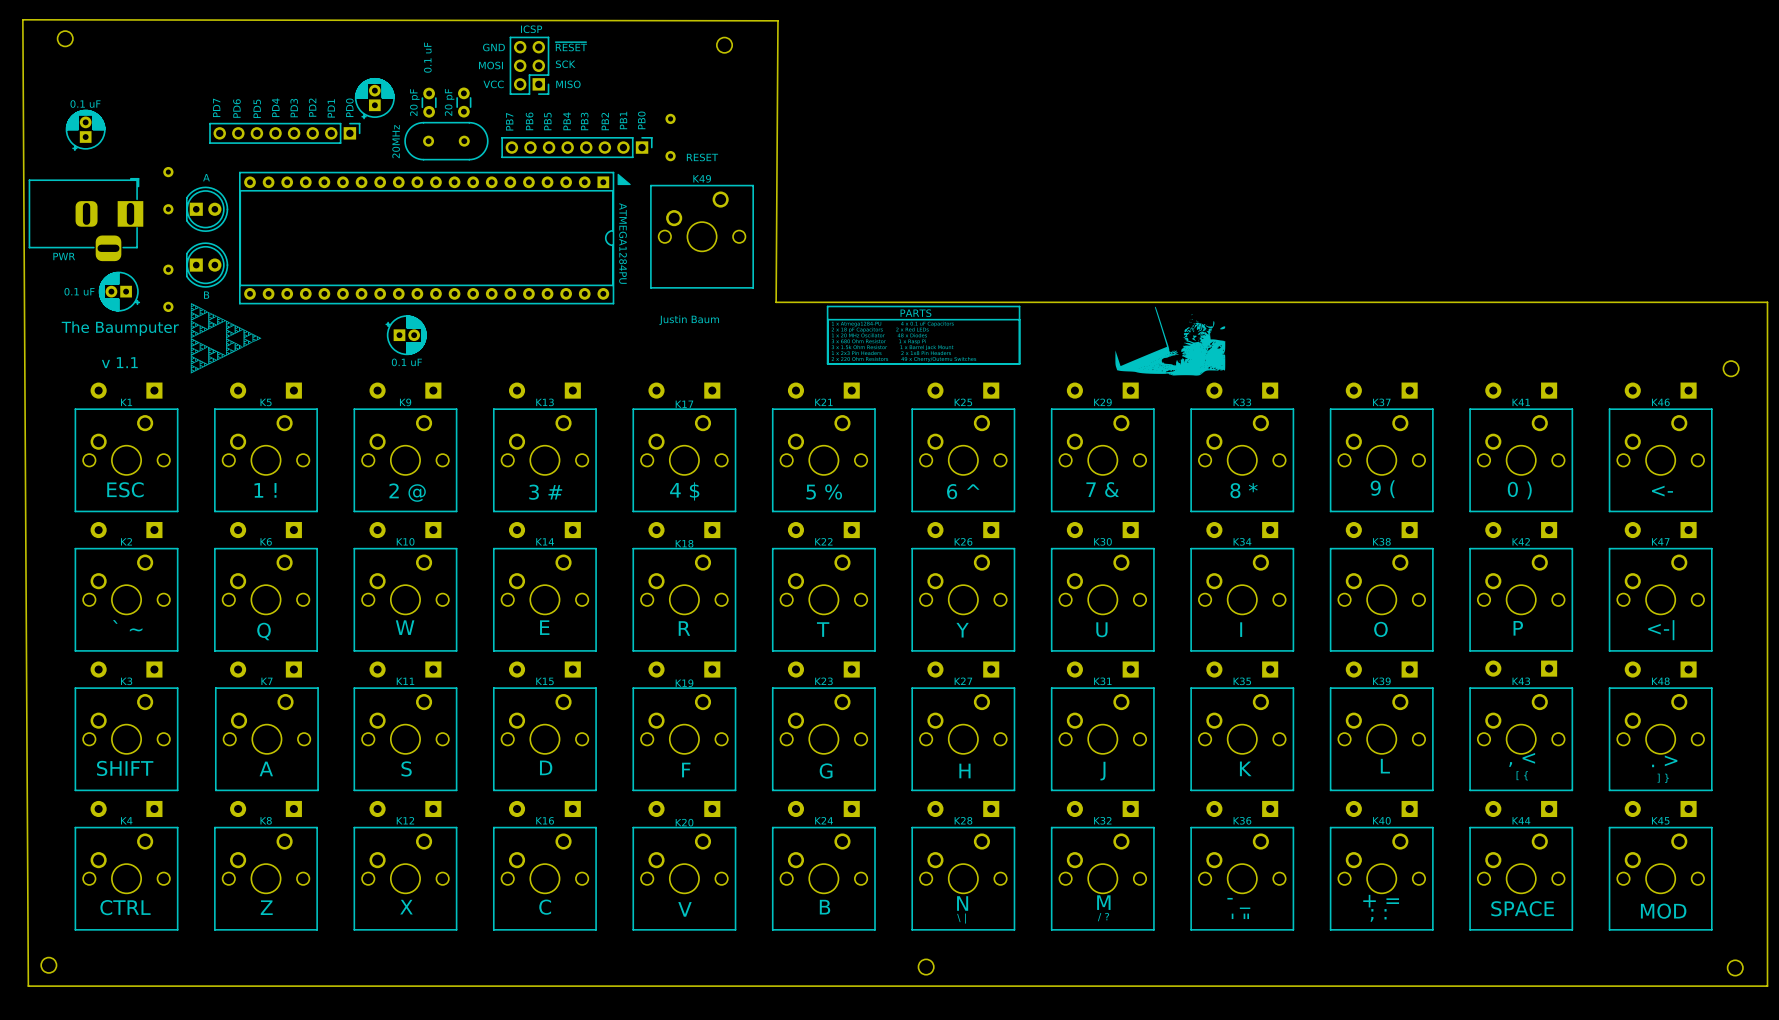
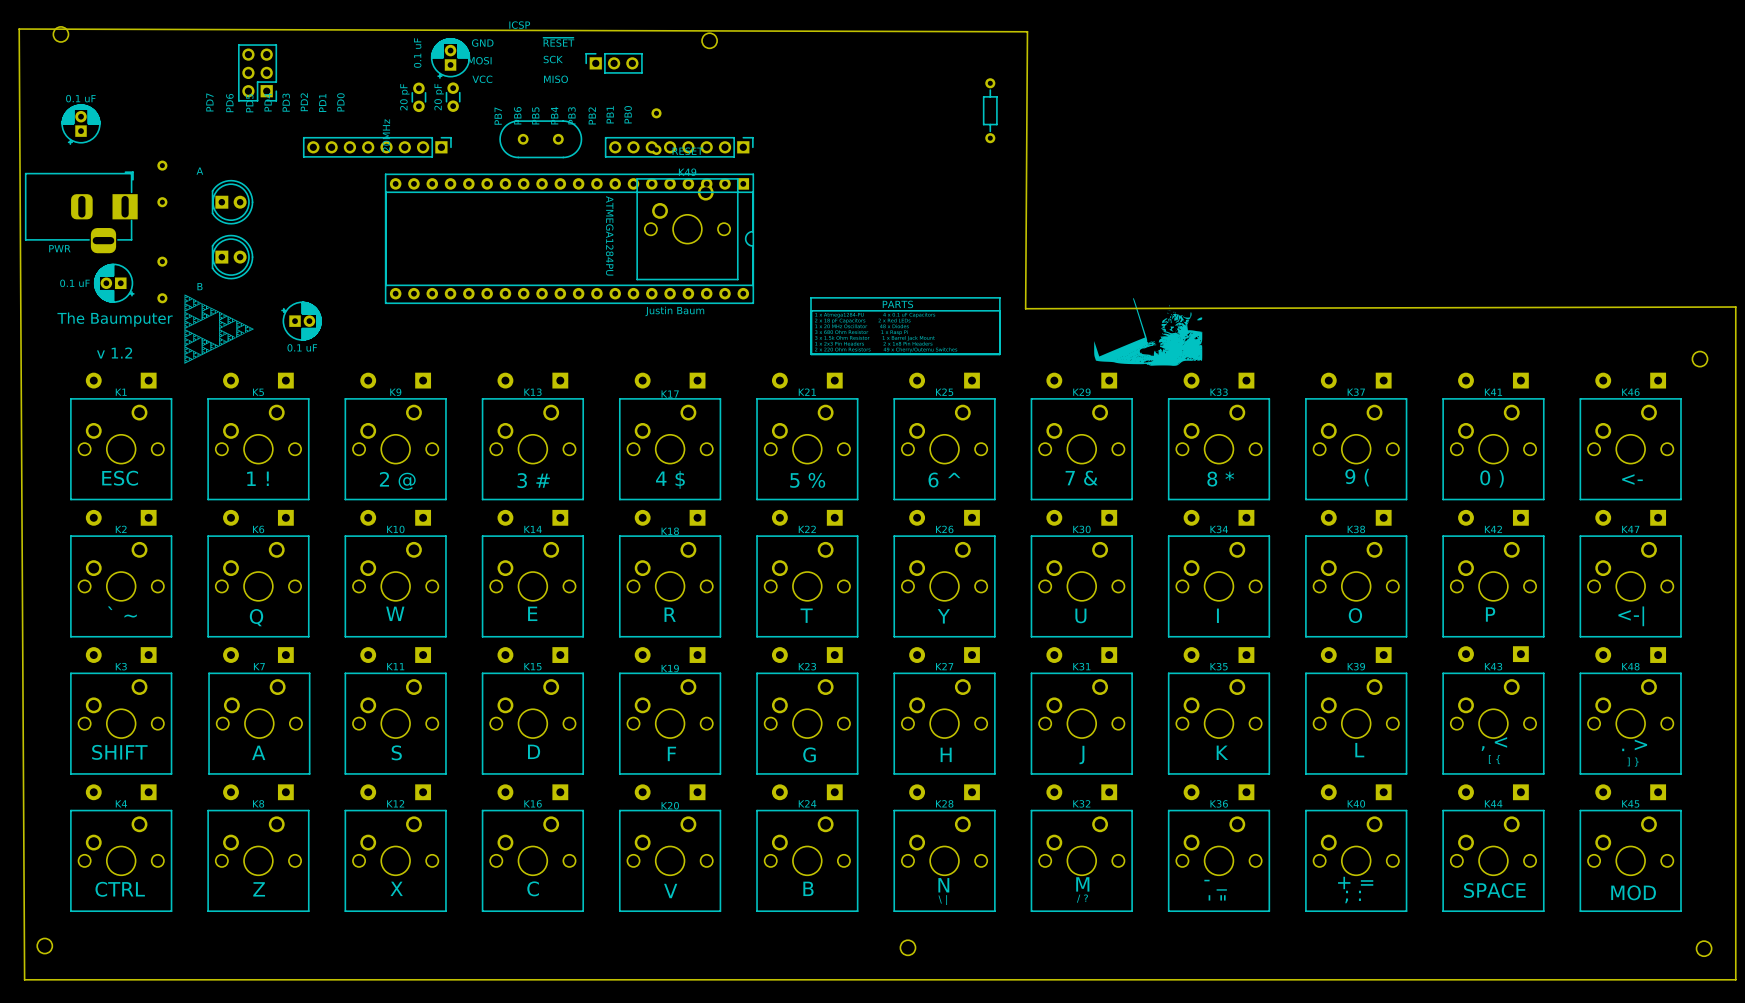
part: (529, 65) -> none
part: none -> (614, 63)
part: none -> (257, 72)
part position: (374, 98) -> (450, 58)
part: none -> (990, 110)
part: (284, 133) -> none
part position: (446, 141) -> (540, 139)
part: (576, 147) -> none
part: none -> (377, 147)
part: none -> (679, 147)
drawing: [617, 173, 631, 186] -> none
part: (207, 209) -> none
part: none -> (232, 202)
part position: (426, 238) -> (569, 238)
part: (207, 265) -> none
part: none -> (232, 257)
board edge: (1767, 315) (1767, 302) (776, 302) (777, 20) (22, 19) (28, 986) (1767, 986) -> (1735, 307) (1025, 308) (1027, 31) (19, 29) (24, 979) (1735, 979) (1735, 966)
part position: (406, 335) -> (301, 321)
text: v 1.1 (119, 362) -> v 1.2 (114, 353)

